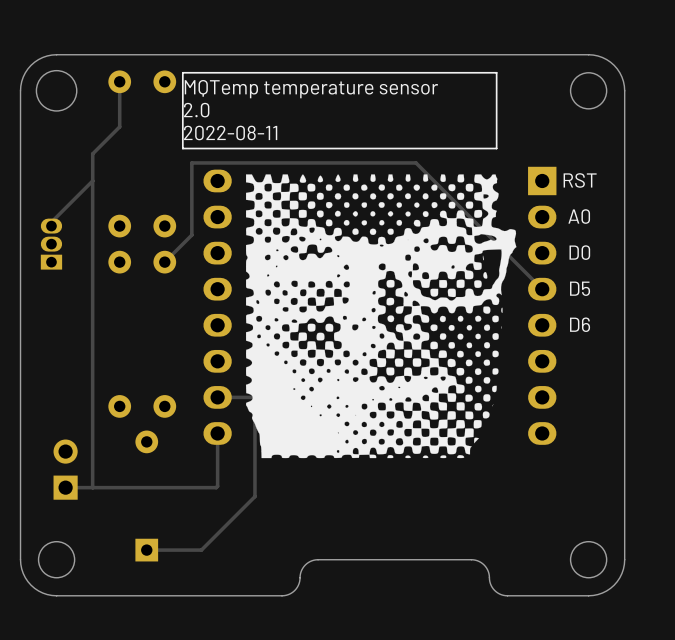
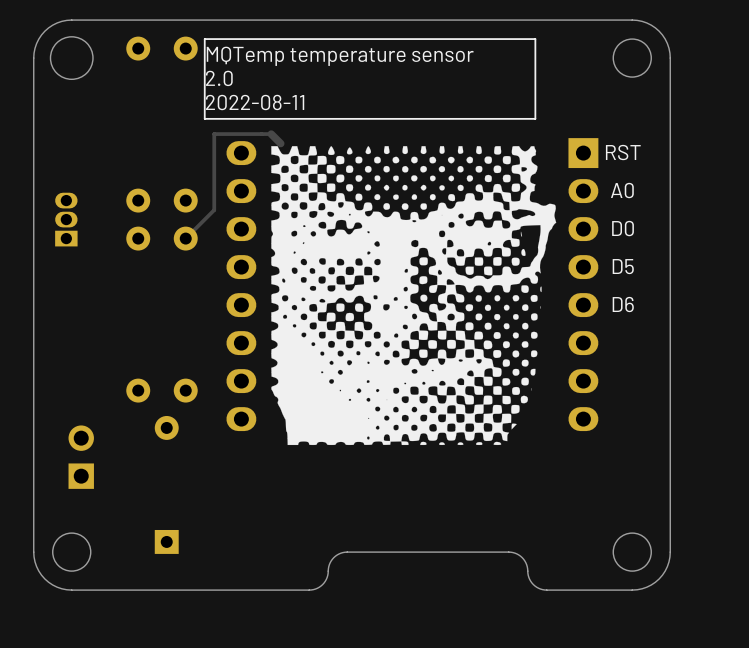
track: (119, 81) (119, 126) (92, 153) -> none
track: (92, 153) (92, 180) (51, 222) -> none
track: (245, 162) (416, 162) (542, 289) -> (271, 134) (280, 143)
track: (92, 180) (92, 487) -> none
track: (217, 397) (254, 397) (254, 496) (201, 550) (146, 550) -> none
track: (217, 433) (216, 487) (65, 487) -> none

